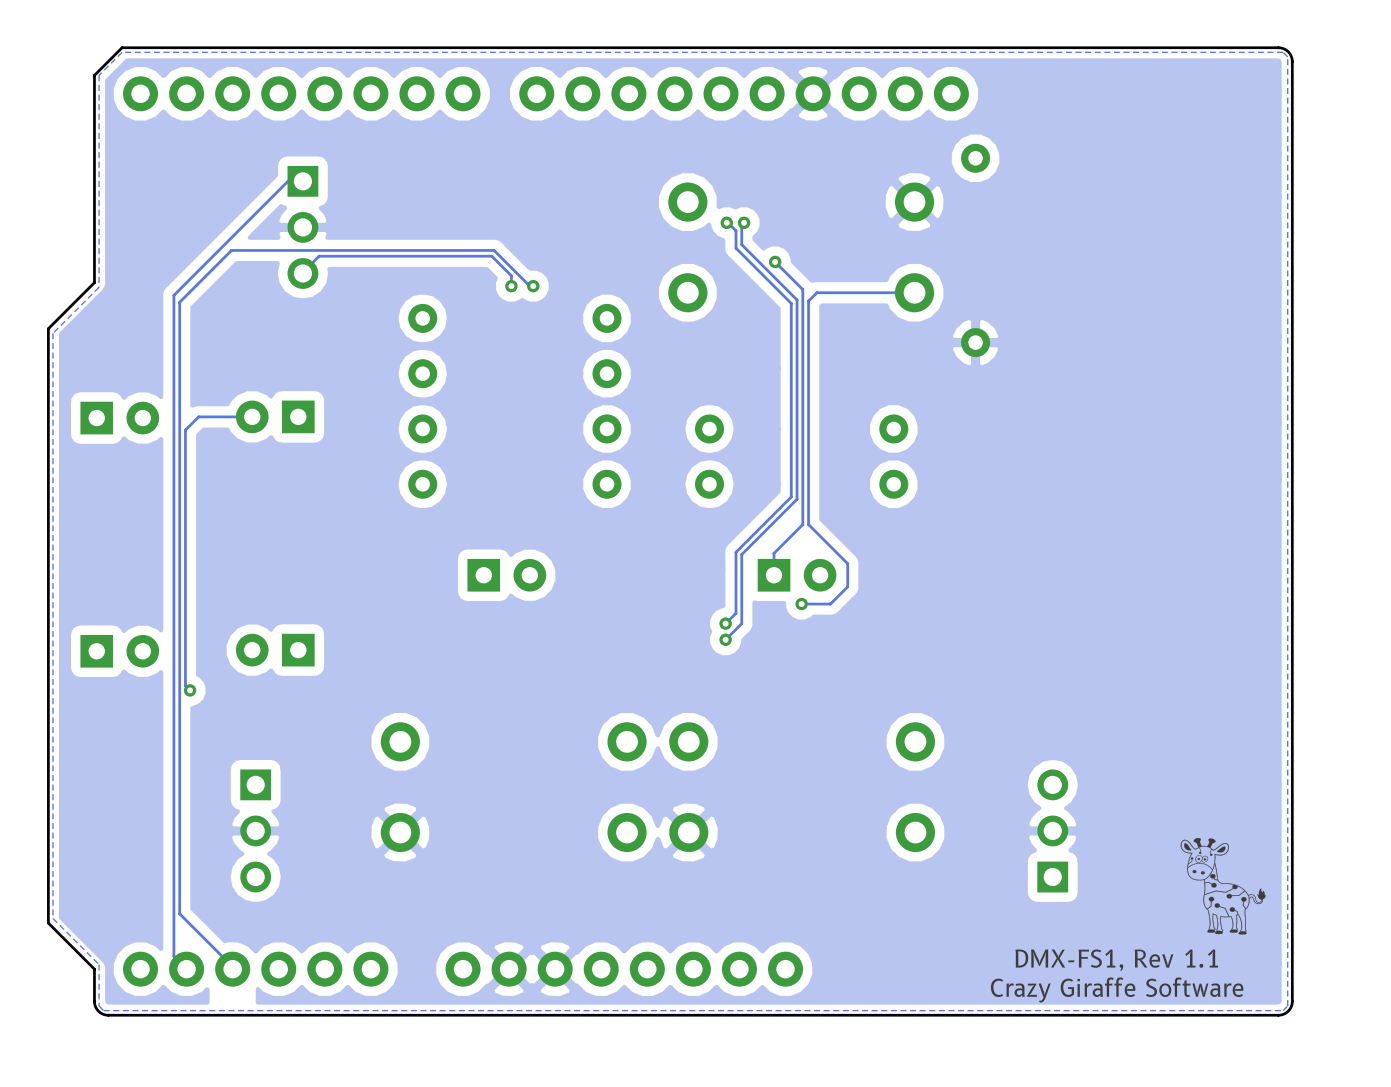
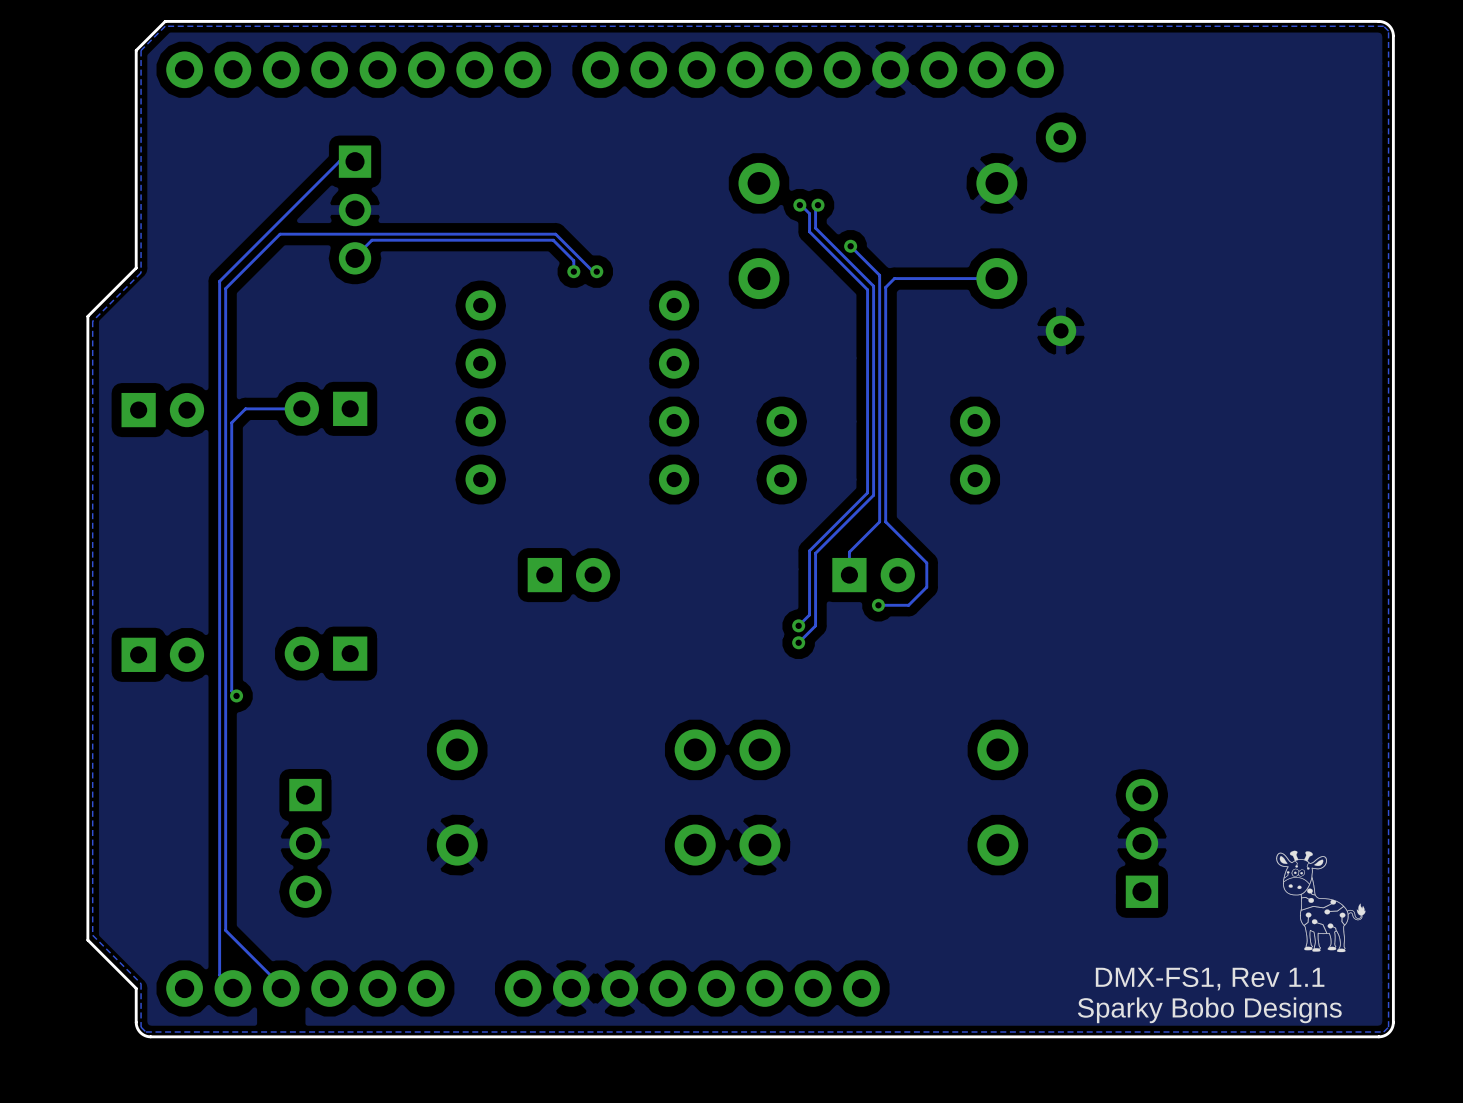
text: Crazy Giraffe Software (1117, 989) -> Sparky Bobo Designs (1209, 1010)

